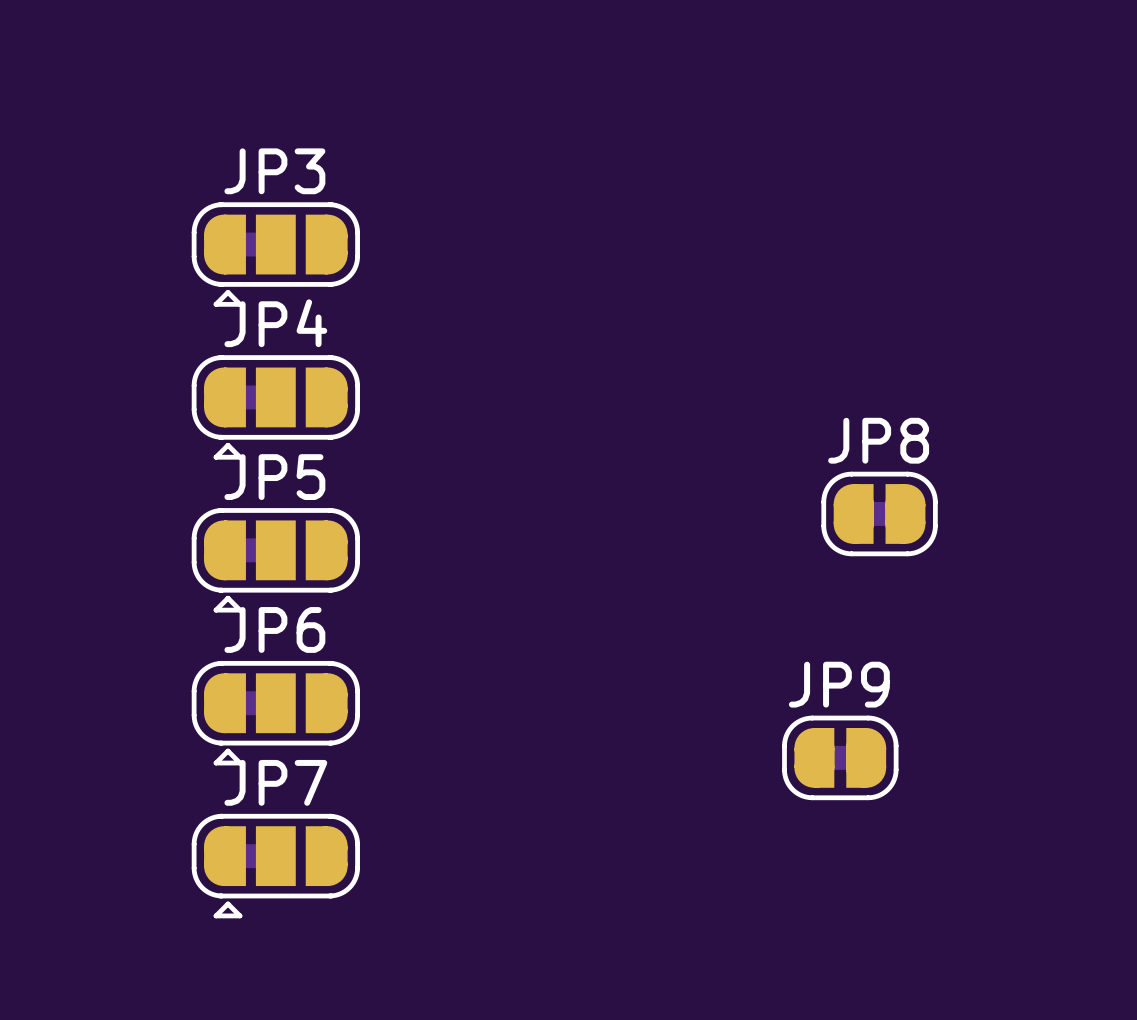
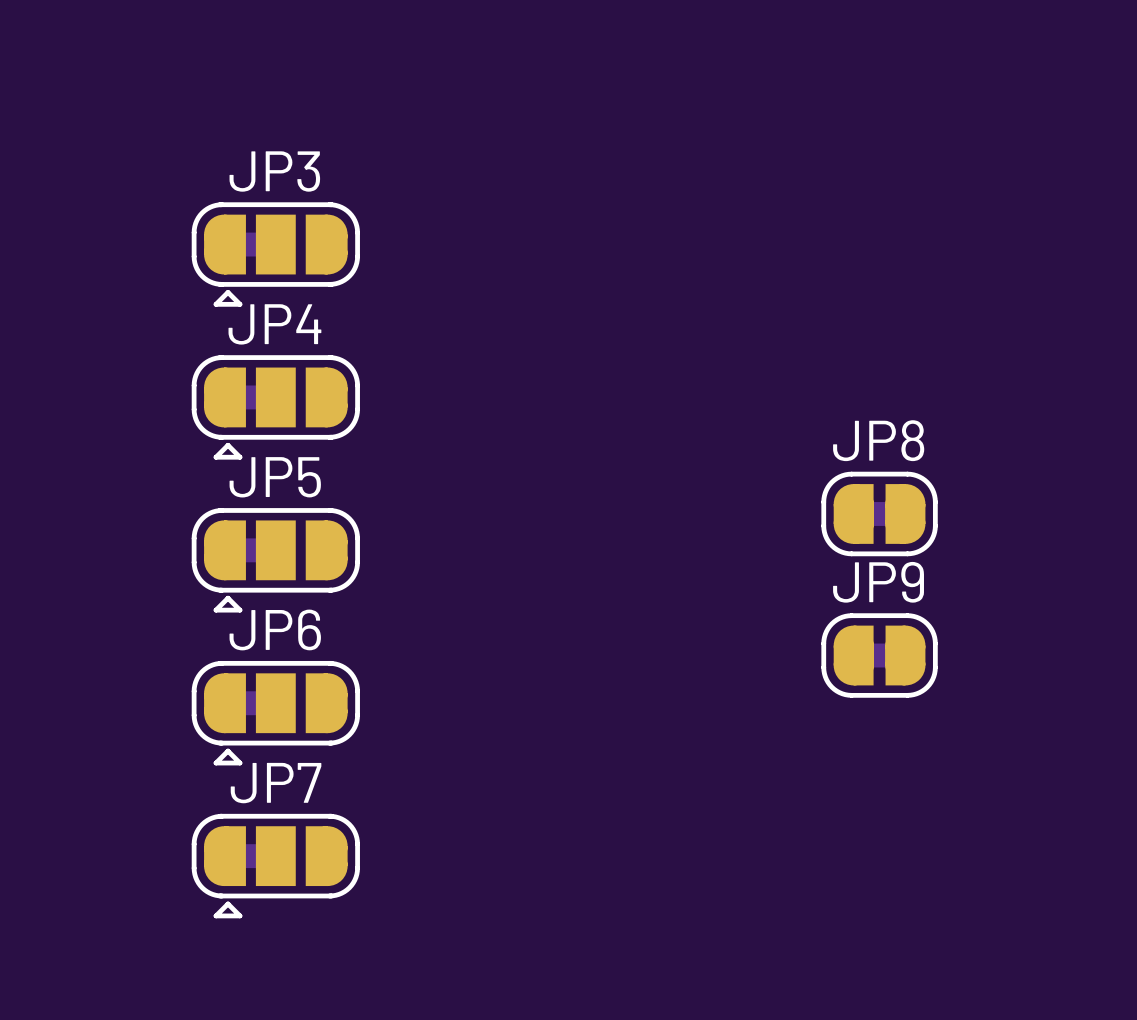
JP9 position: (840, 757) -> (879, 655)

